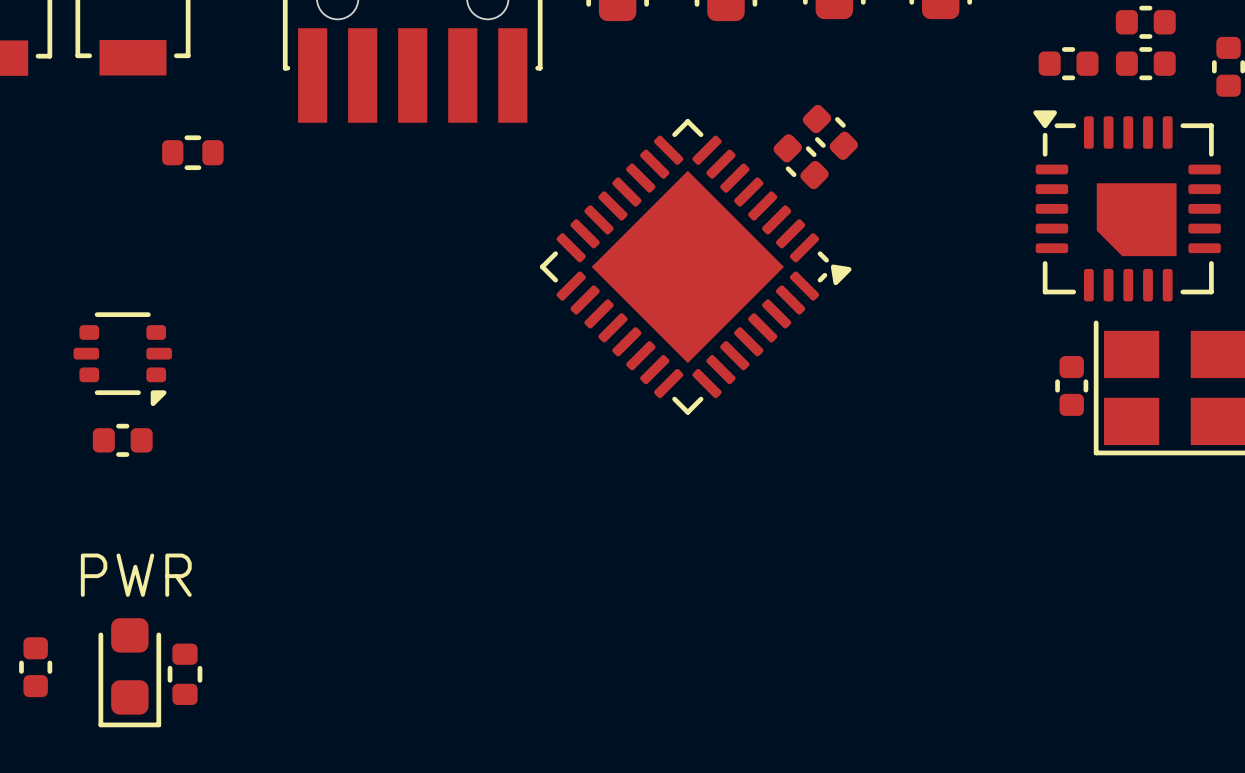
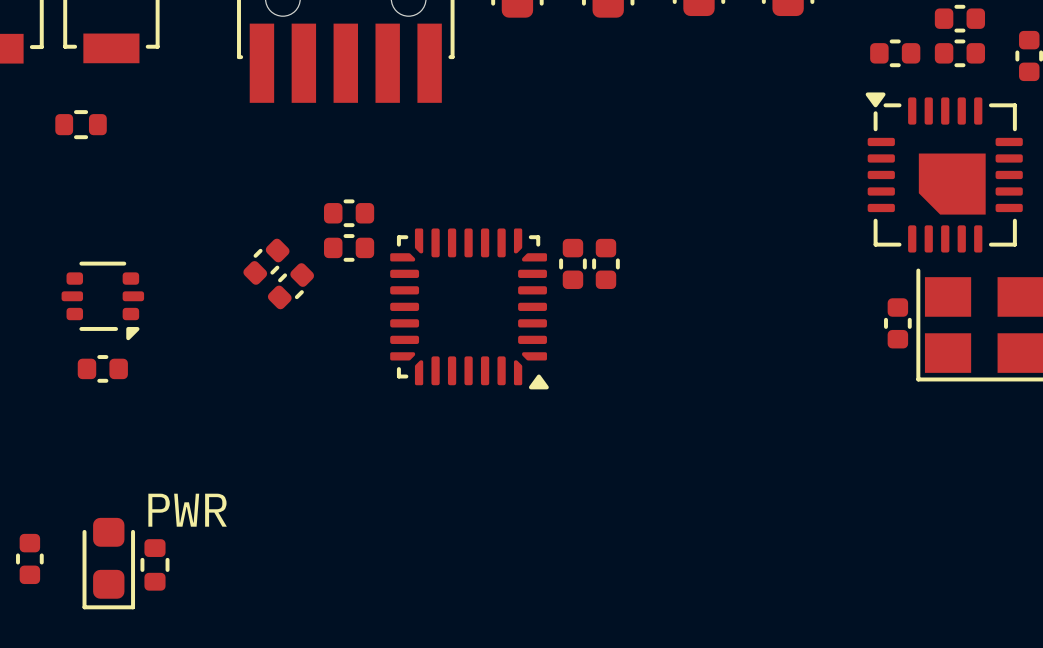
part: (830, 132) -> none
part position: (192, 152) -> (81, 124)
part: (801, 161) -> none
part: none -> (349, 213)
part: (695, 266) -> none
part: none -> (349, 247)
part: none -> (266, 261)
part: none -> (572, 263)
part: none -> (605, 263)
part: none -> (290, 286)
part: none -> (469, 308)
text position: PWR (136, 575) -> PWR (187, 510)

